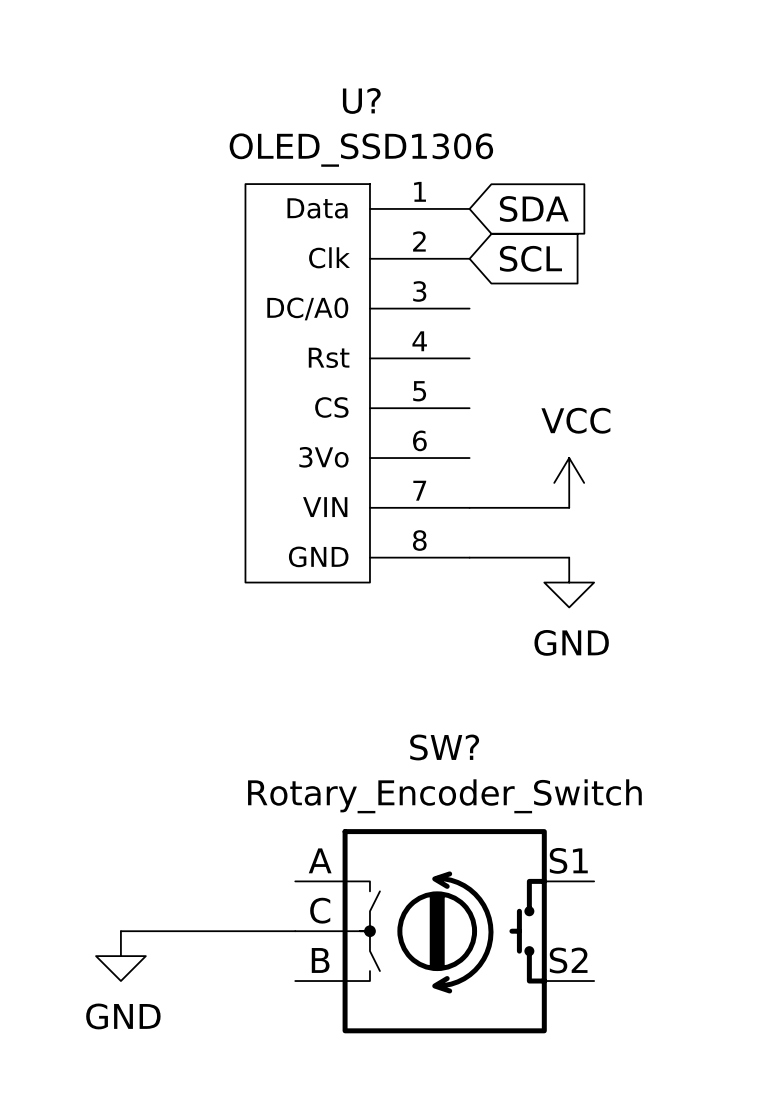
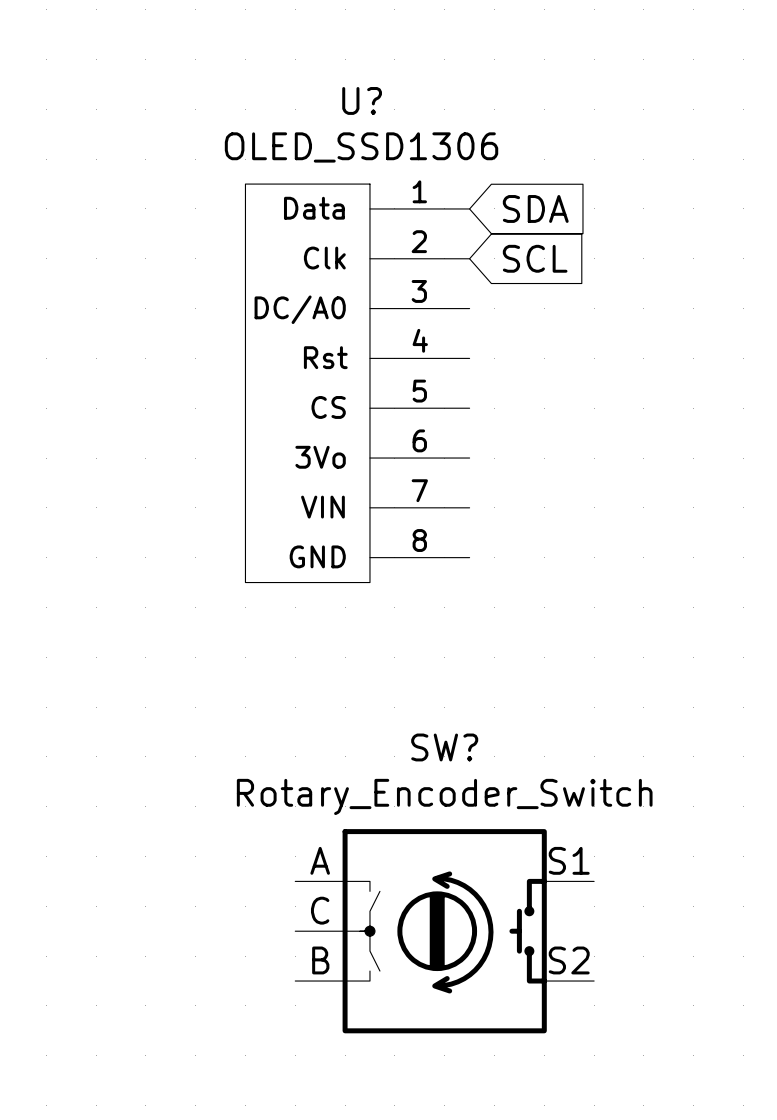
power symbol: VCC (569, 482) -> none
wire: (469, 507) (569, 507) -> none
wire: (469, 557) (569, 557) -> none
power symbol: GND (569, 582) -> none
wire: (120, 931) (295, 931) -> none
power symbol: GND (120, 956) -> none

